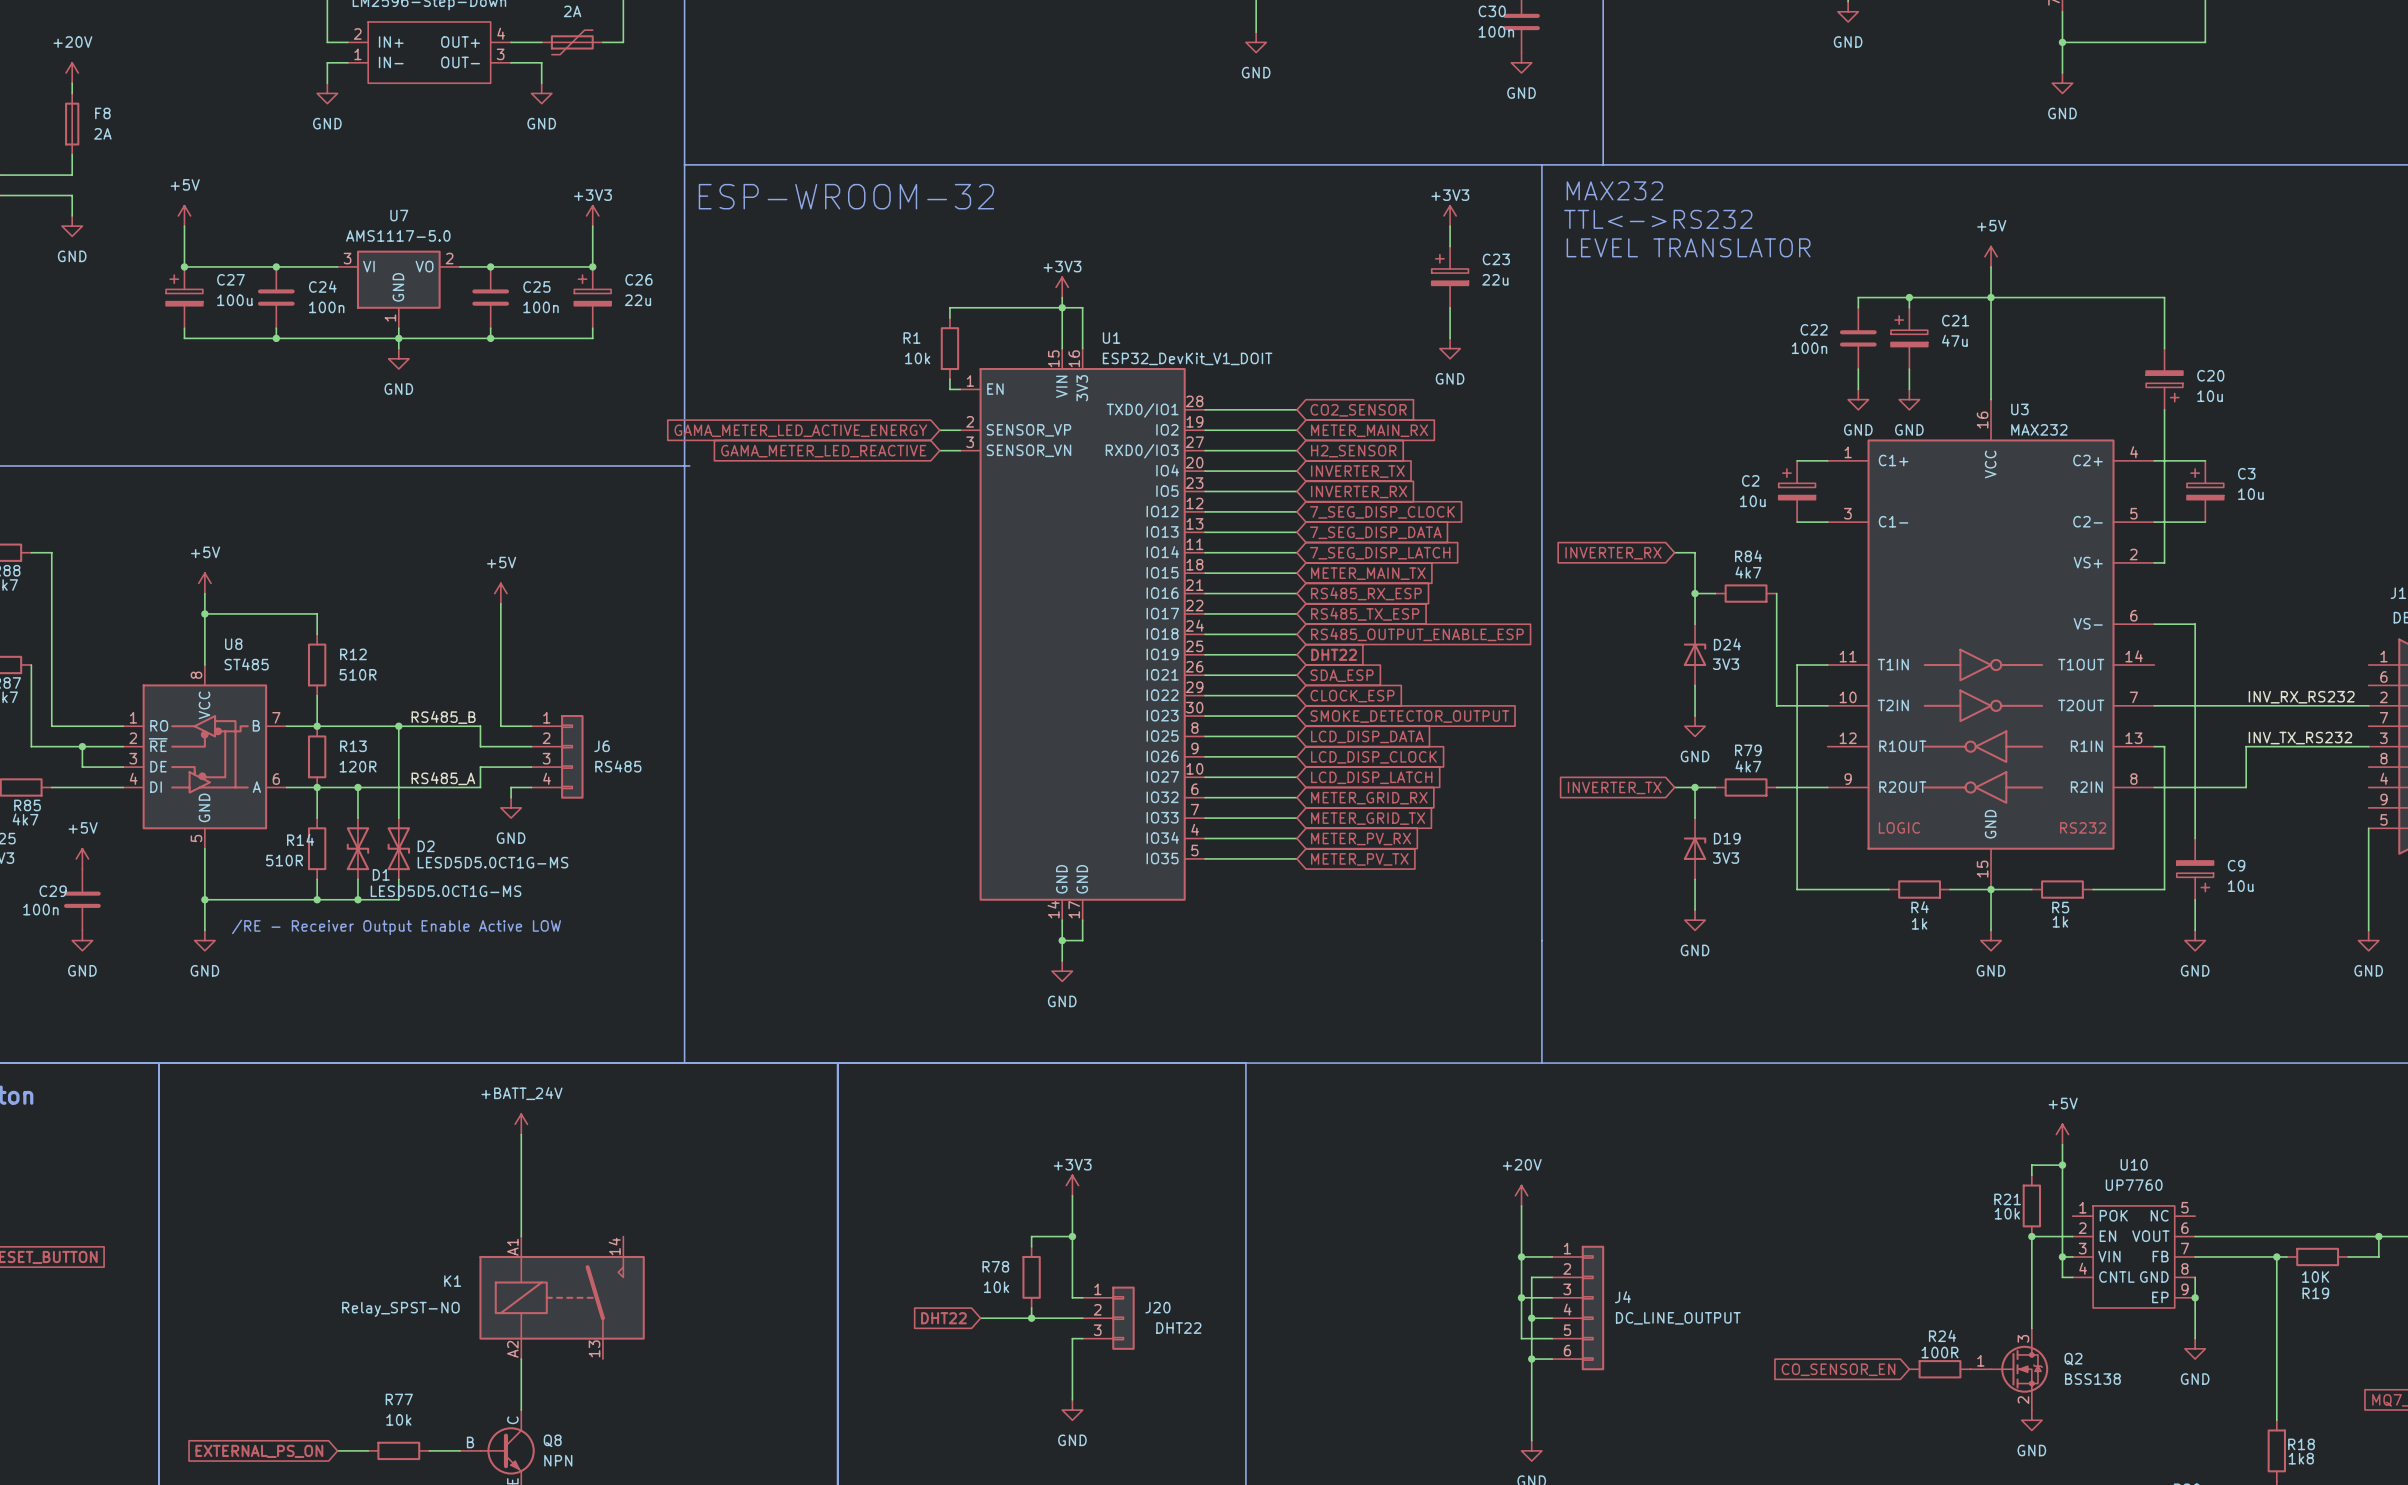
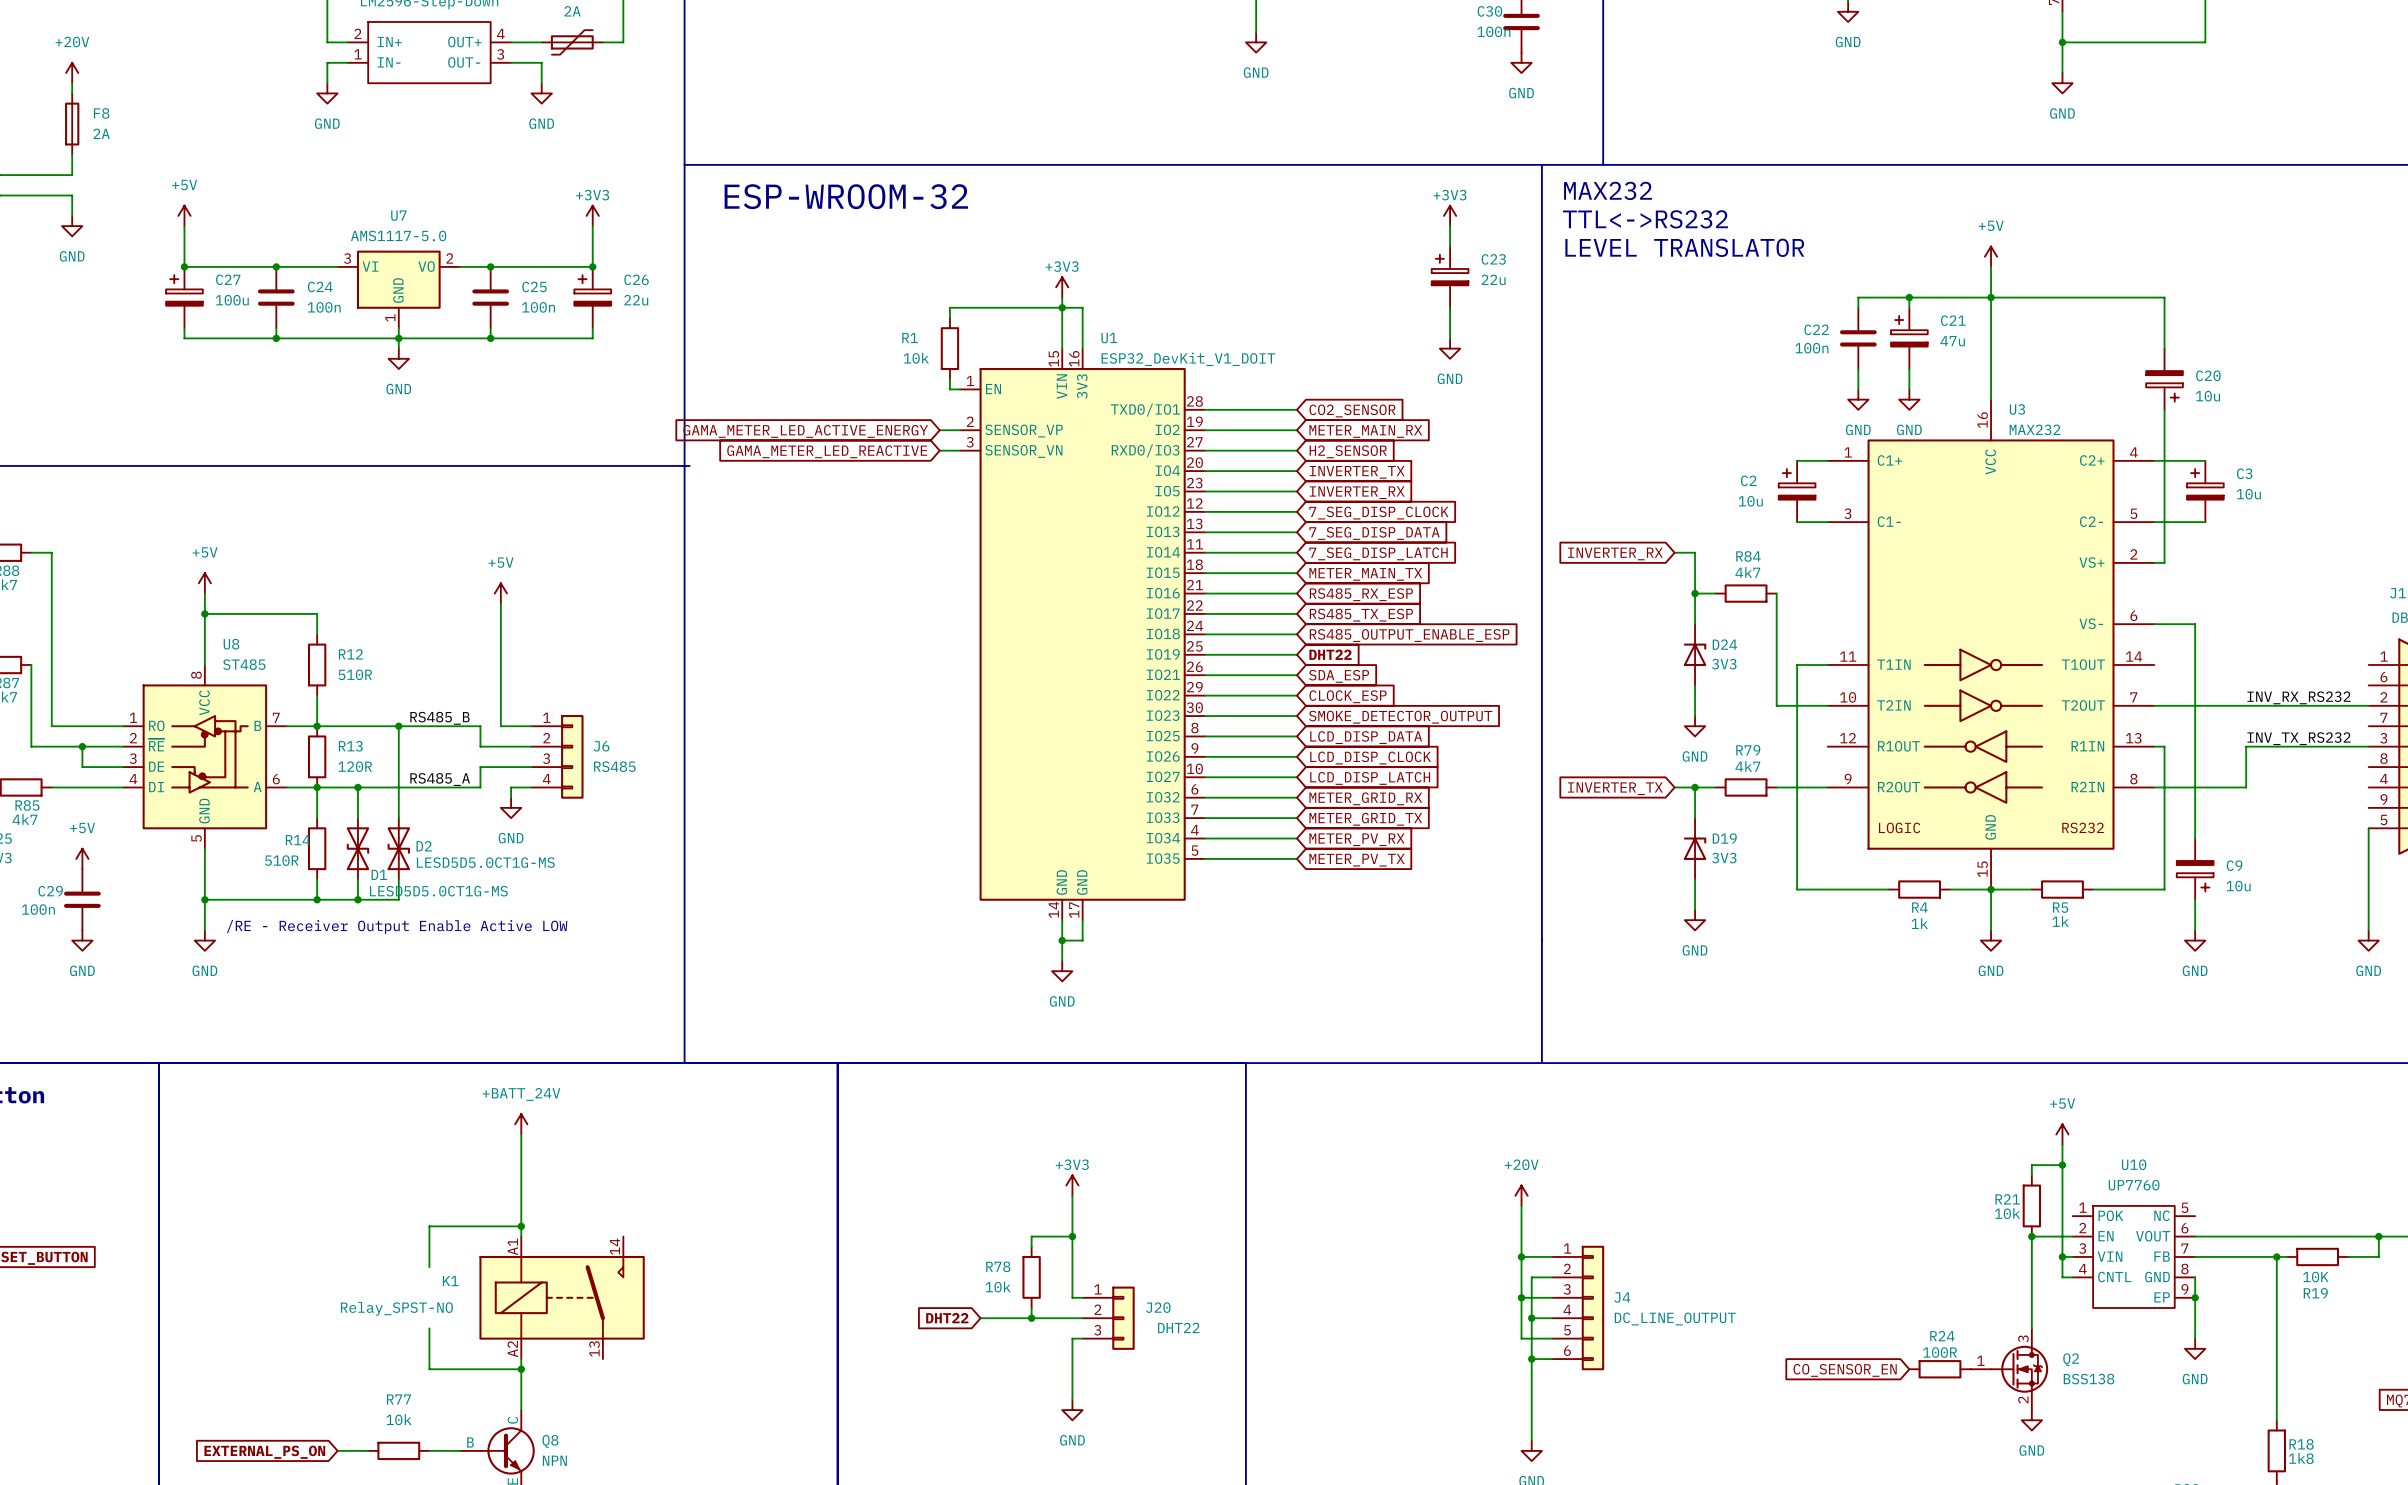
wire: none -> (521, 1226) (429, 1226) (429, 1267)
junction: none -> (521, 1226)
wire: none -> (429, 1328) (429, 1369) (521, 1369)
junction: none -> (521, 1369)

